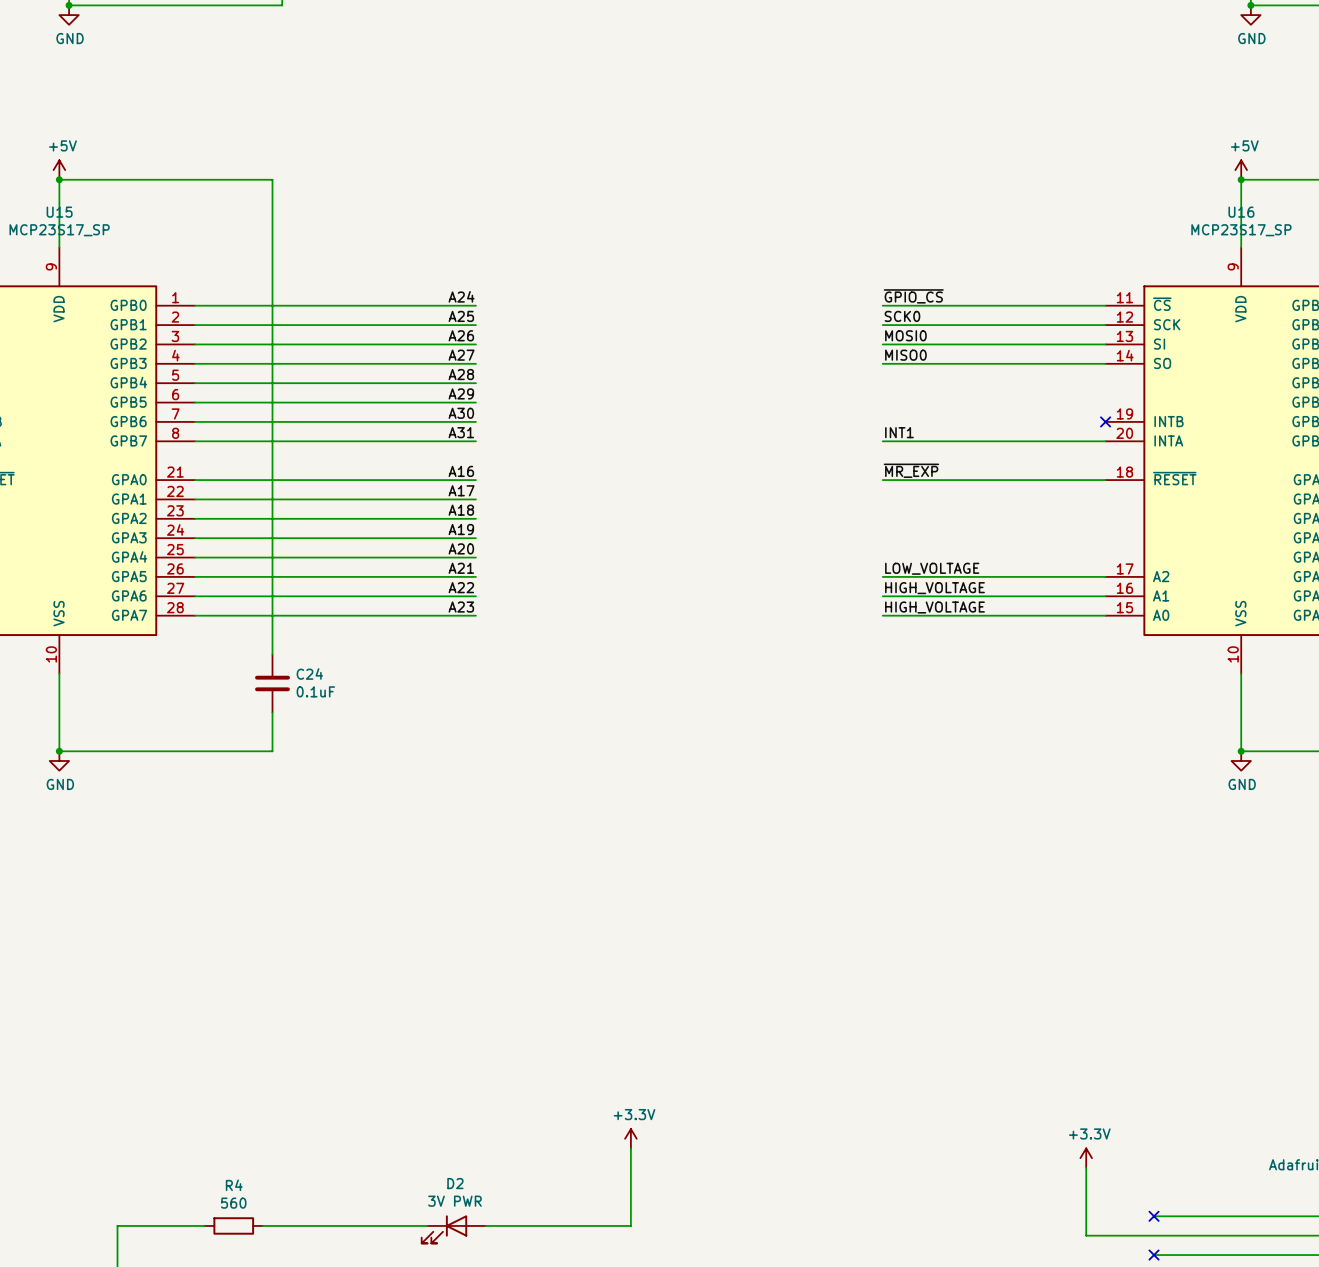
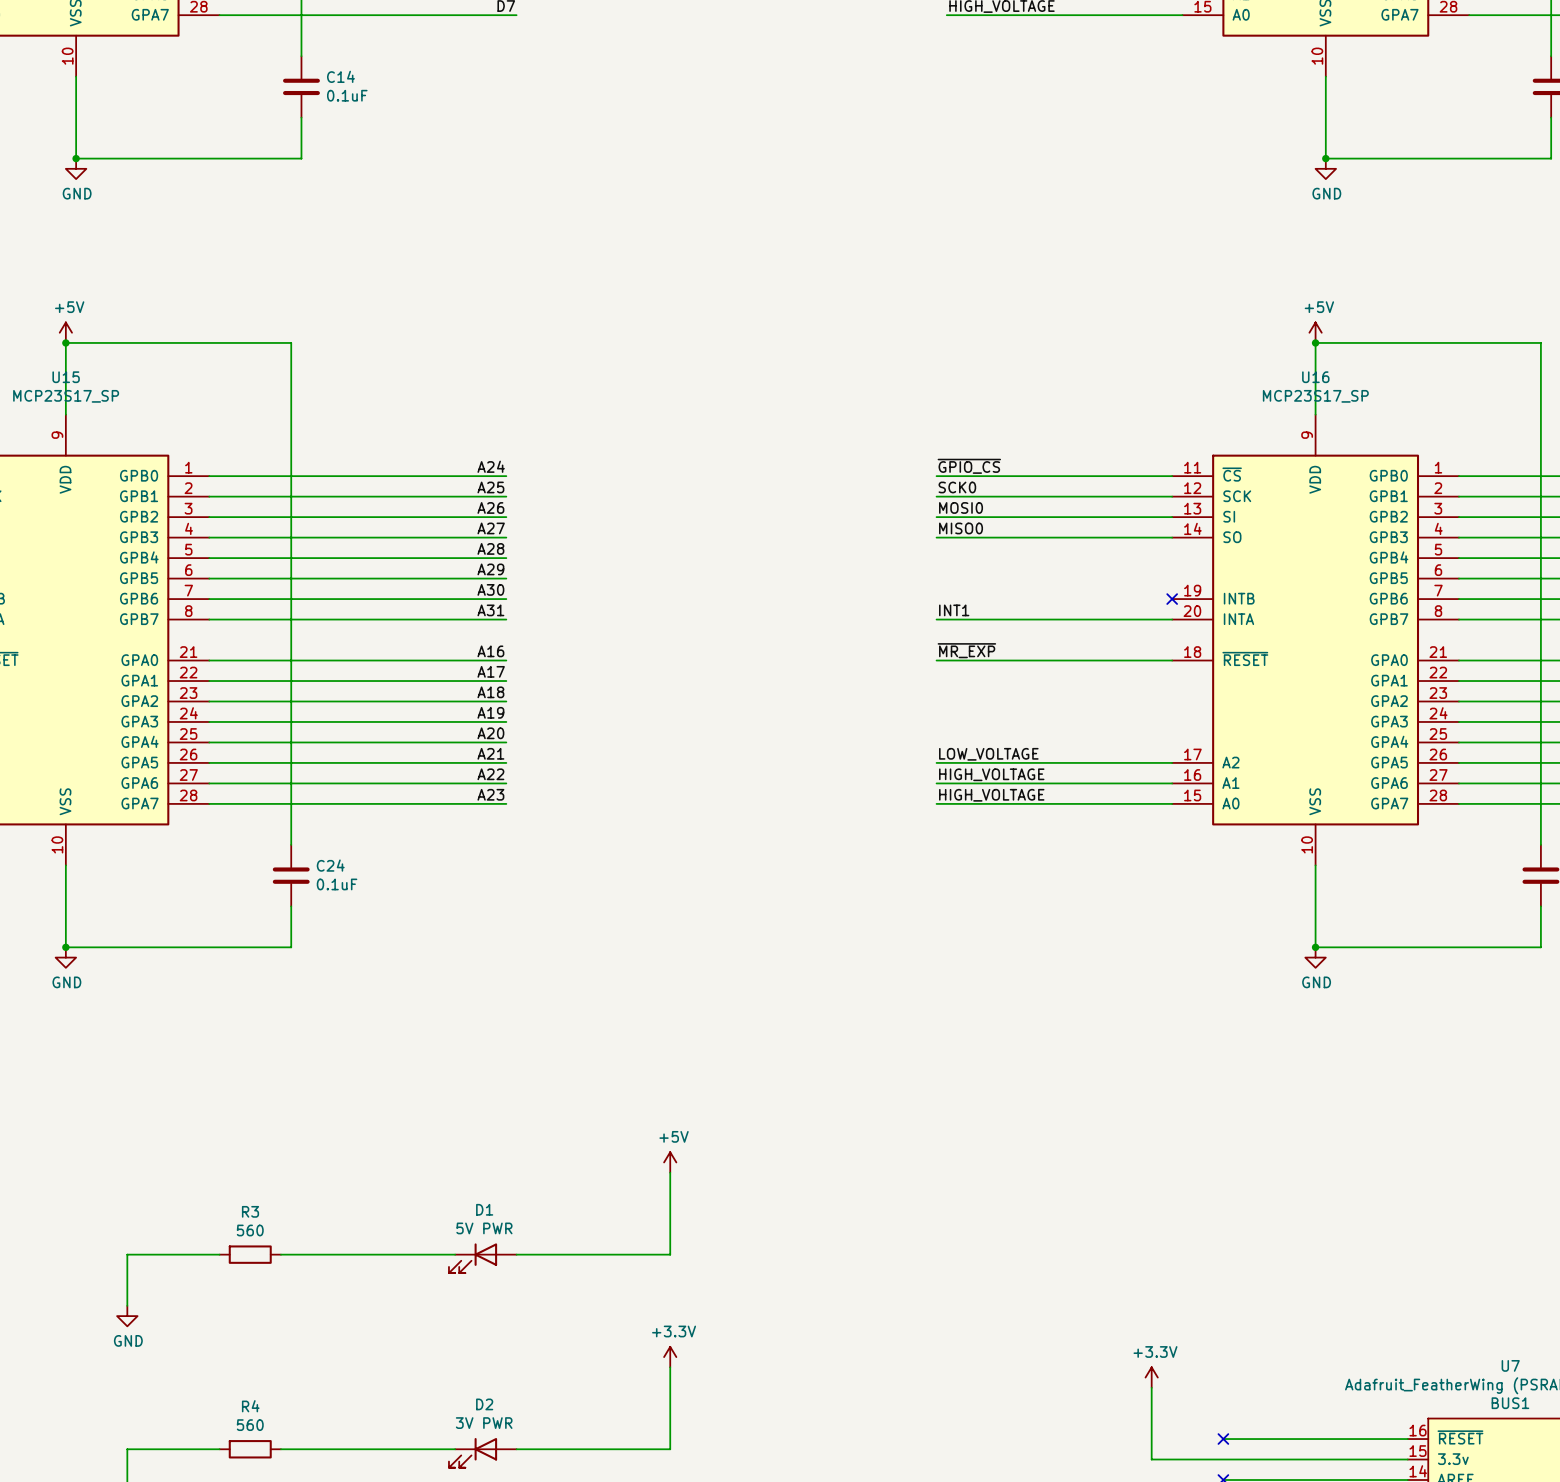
power symbol: none -> +5V (670, 1162)
wire: none -> (670, 1172) (670, 1254) (516, 1254)
wire: none -> (219, 1254) (127, 1254) (127, 1305)
R3: none -> 560 (250, 1254)
wire: none -> (280, 1254) (455, 1254)
D1: none -> 5V PWR (482, 1258)
power symbol: none -> GND (127, 1316)

